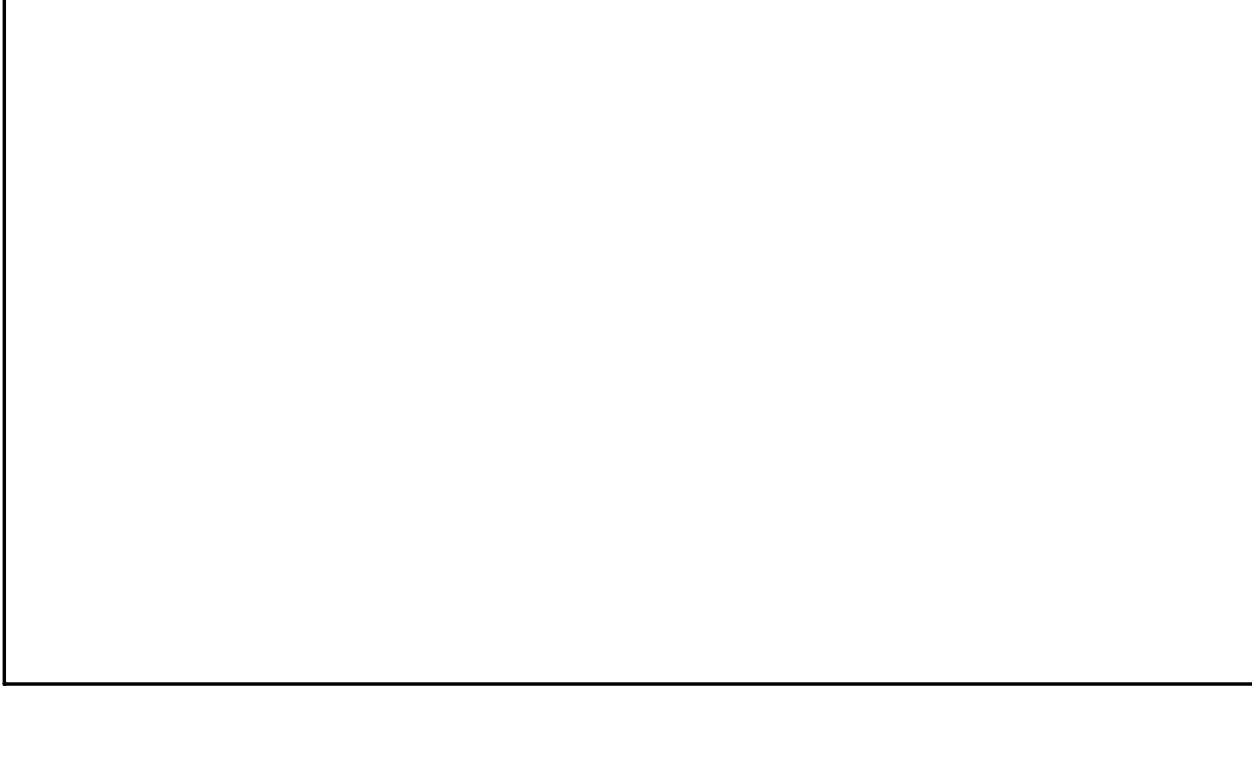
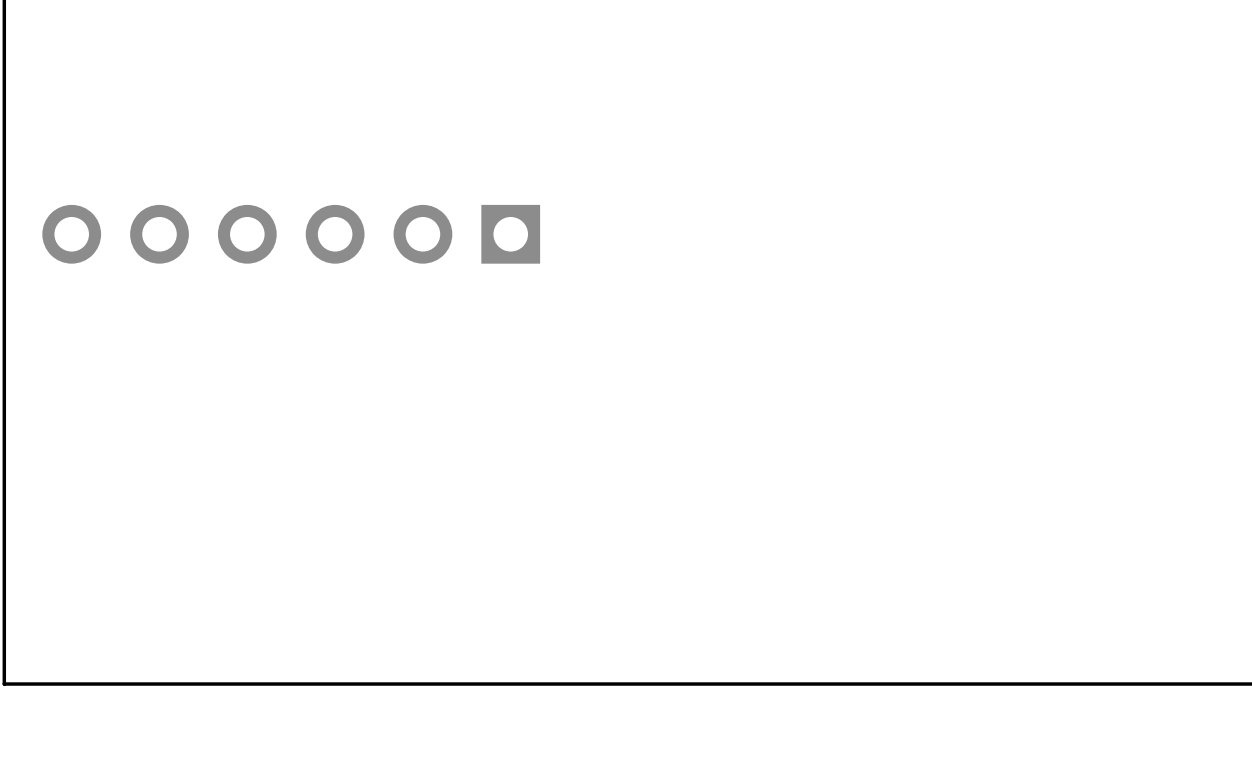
part: none -> (291, 234)

